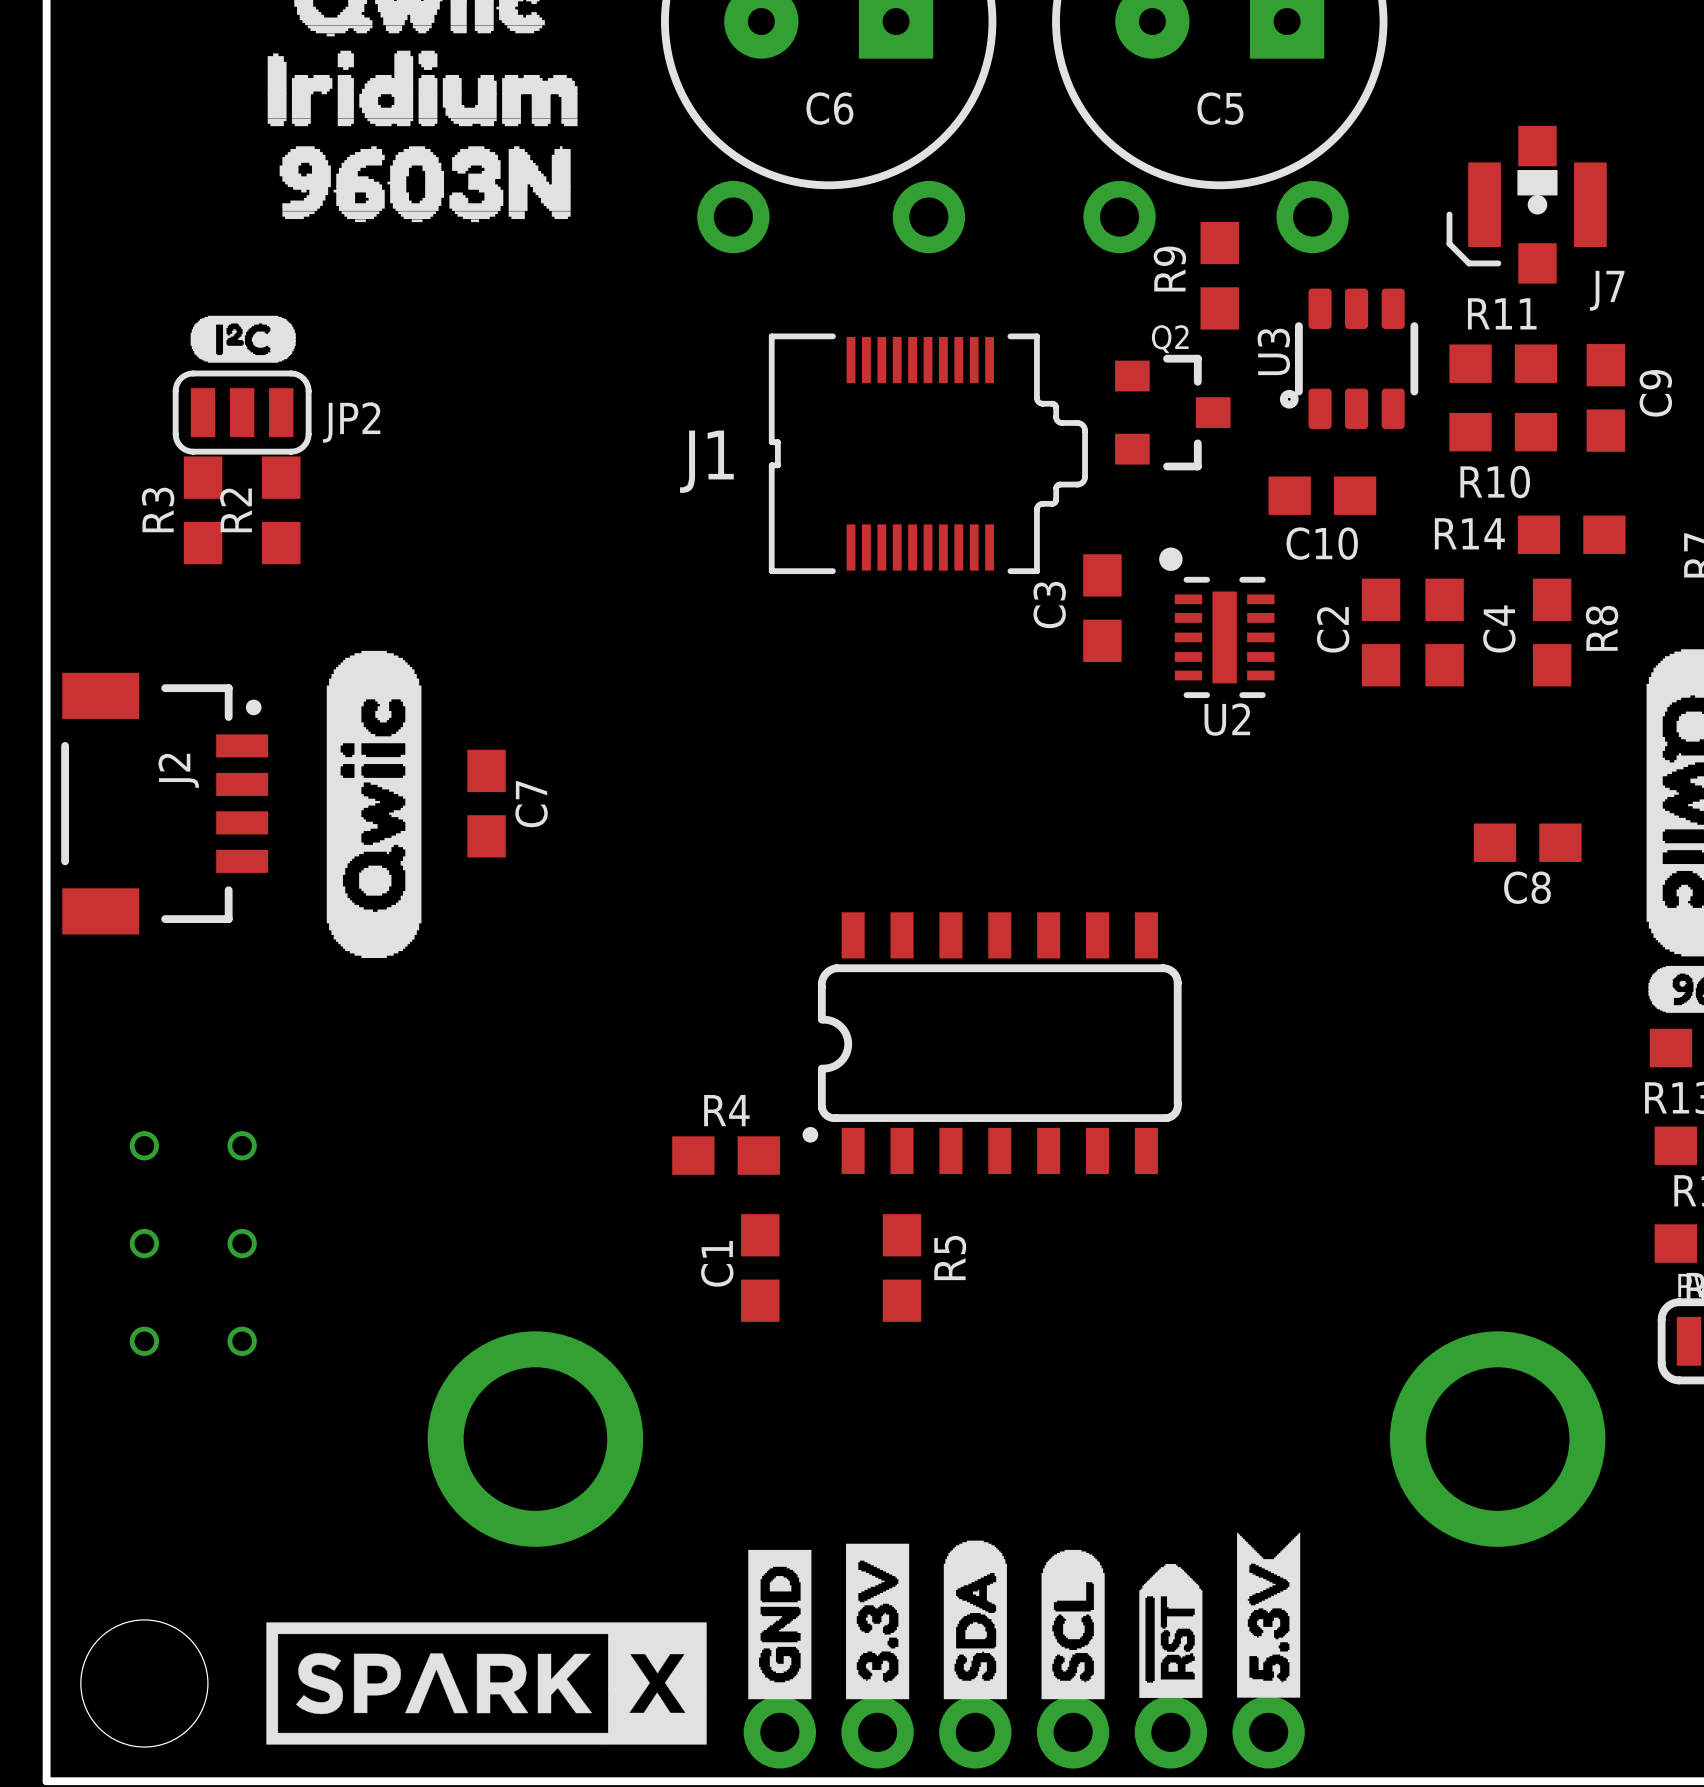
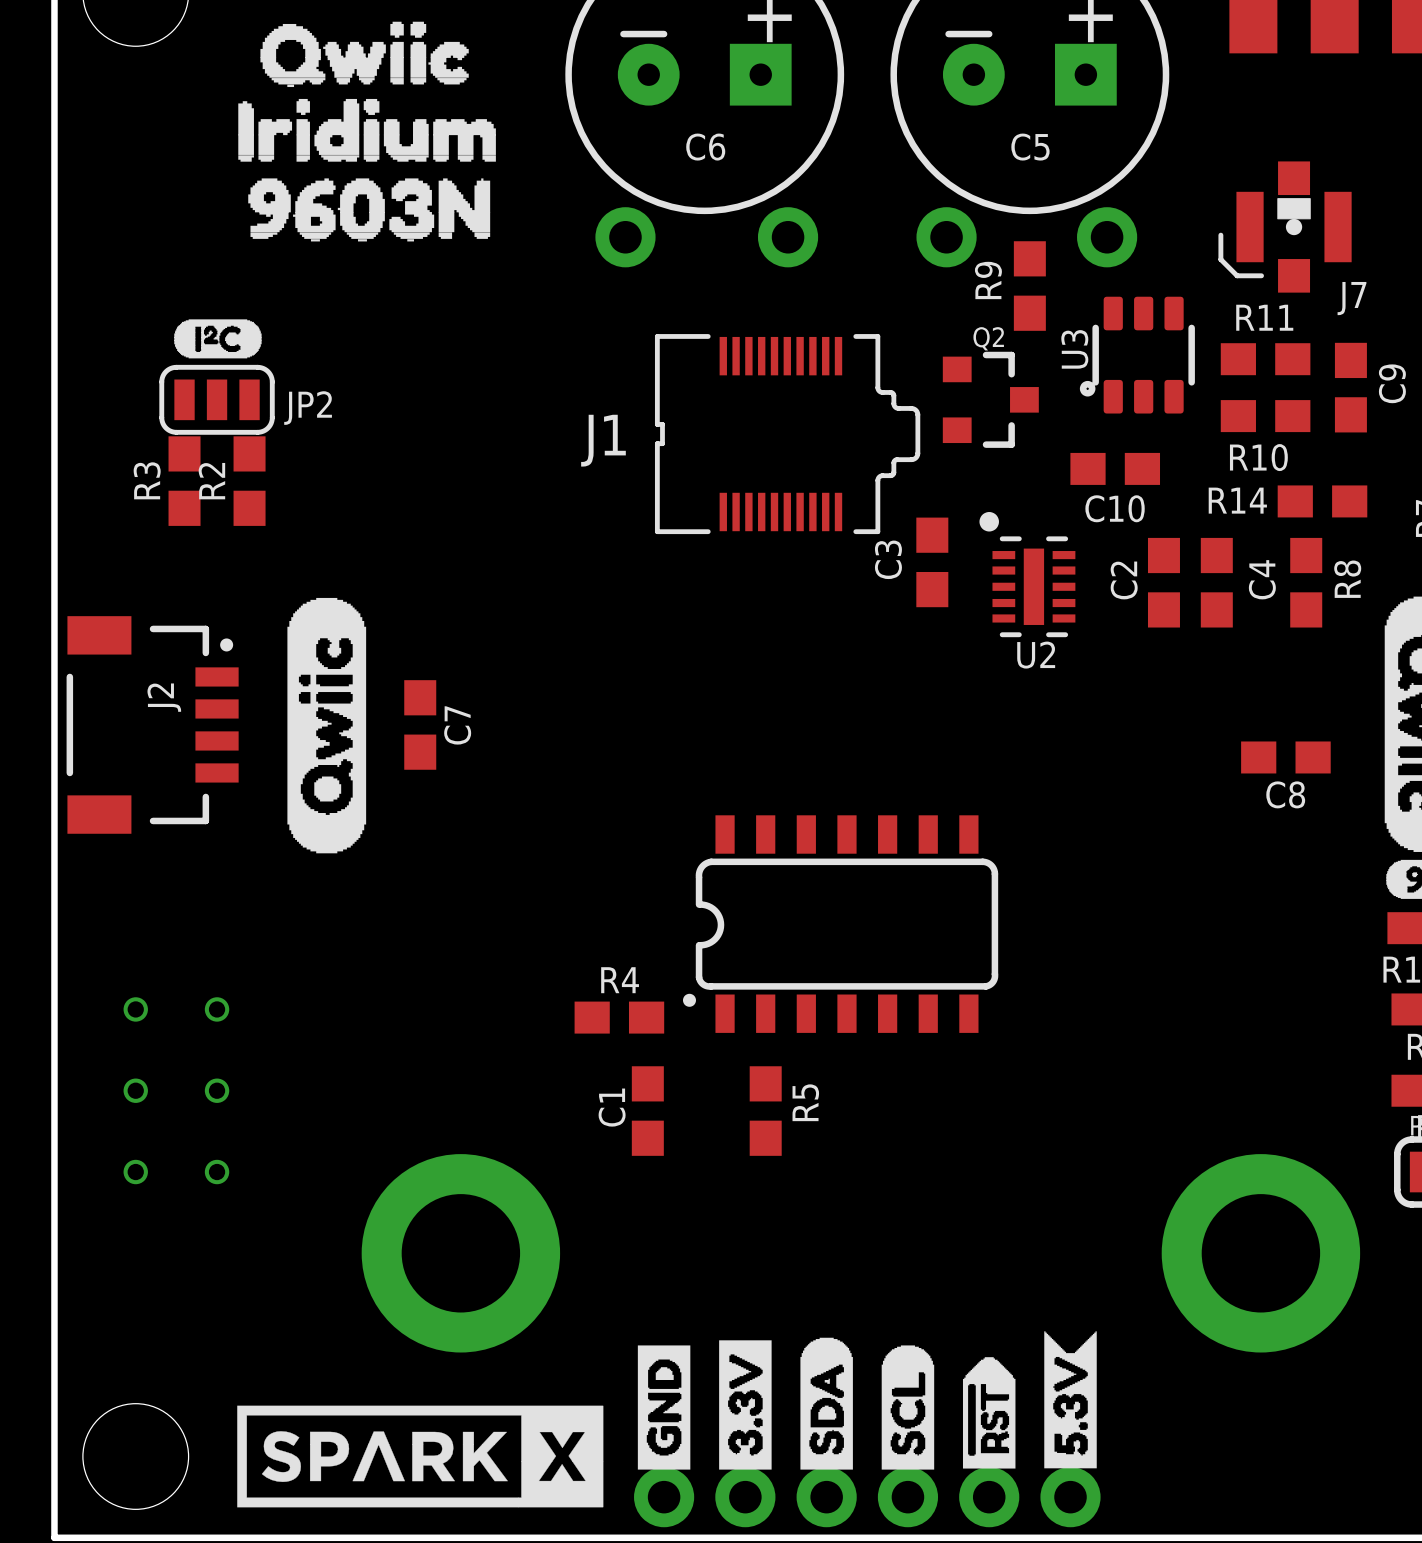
J1 footprint: [427, 333, 1606, 1547] -> [361, 334, 1361, 1353]

